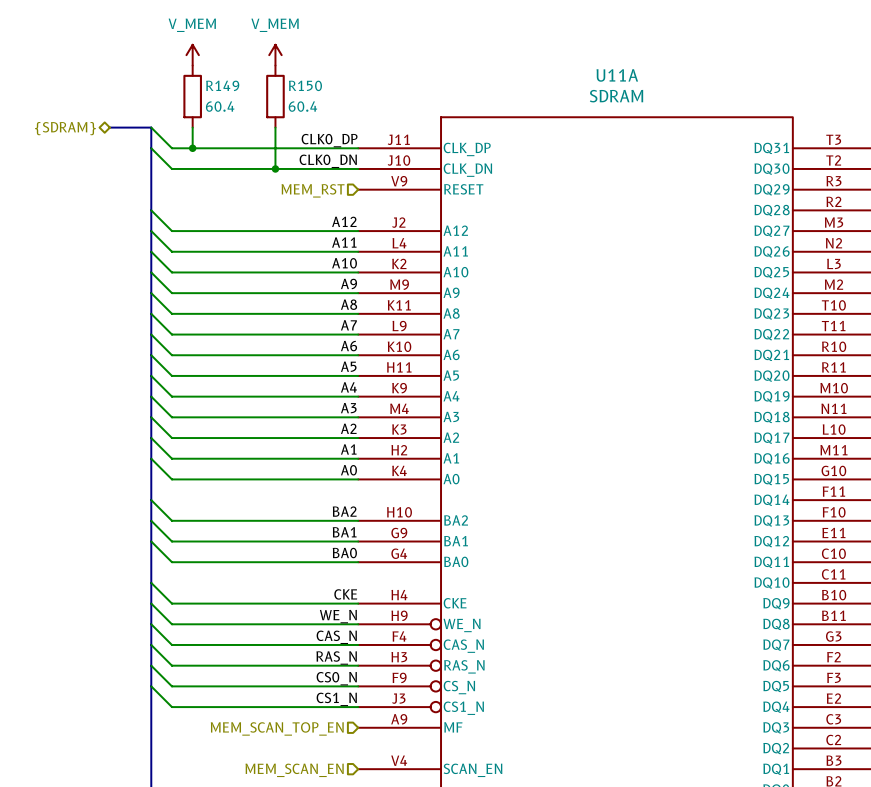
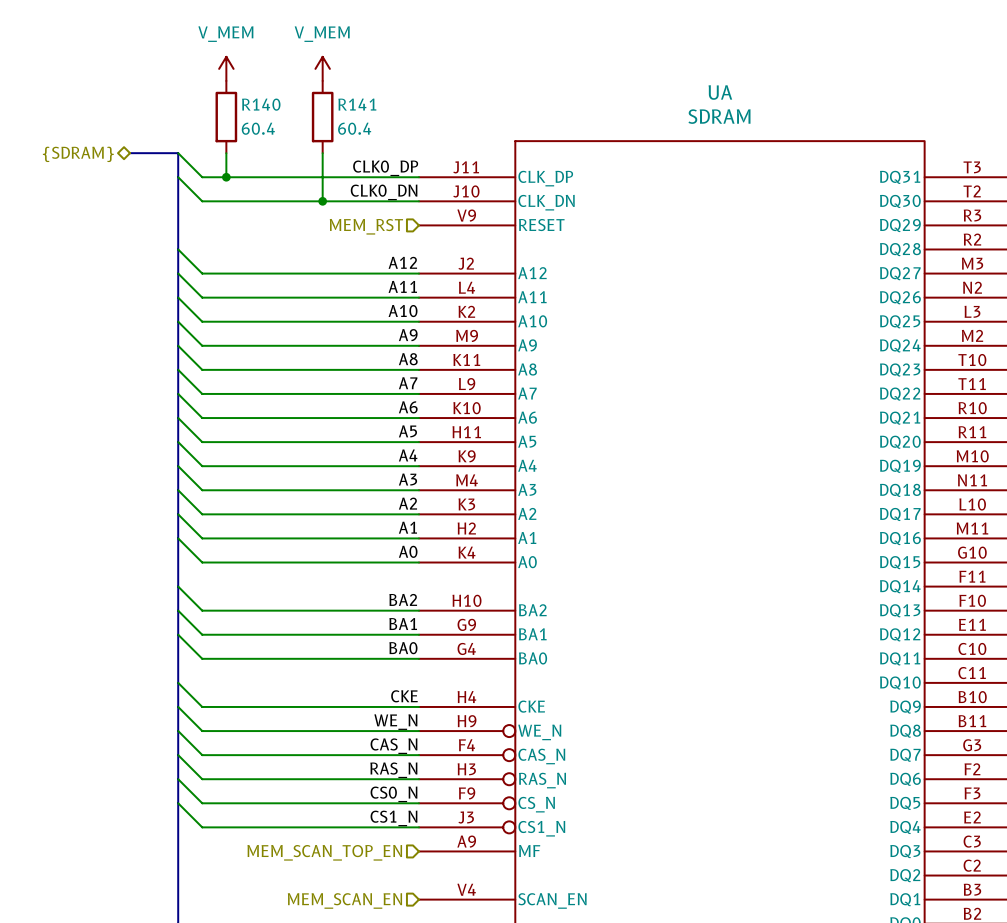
U11A name: U11A (617, 75) -> UA (720, 92)
R149 name: R149 (222, 85) -> R140 (261, 104)
R150 name: R150 (305, 85) -> R141 (357, 104)

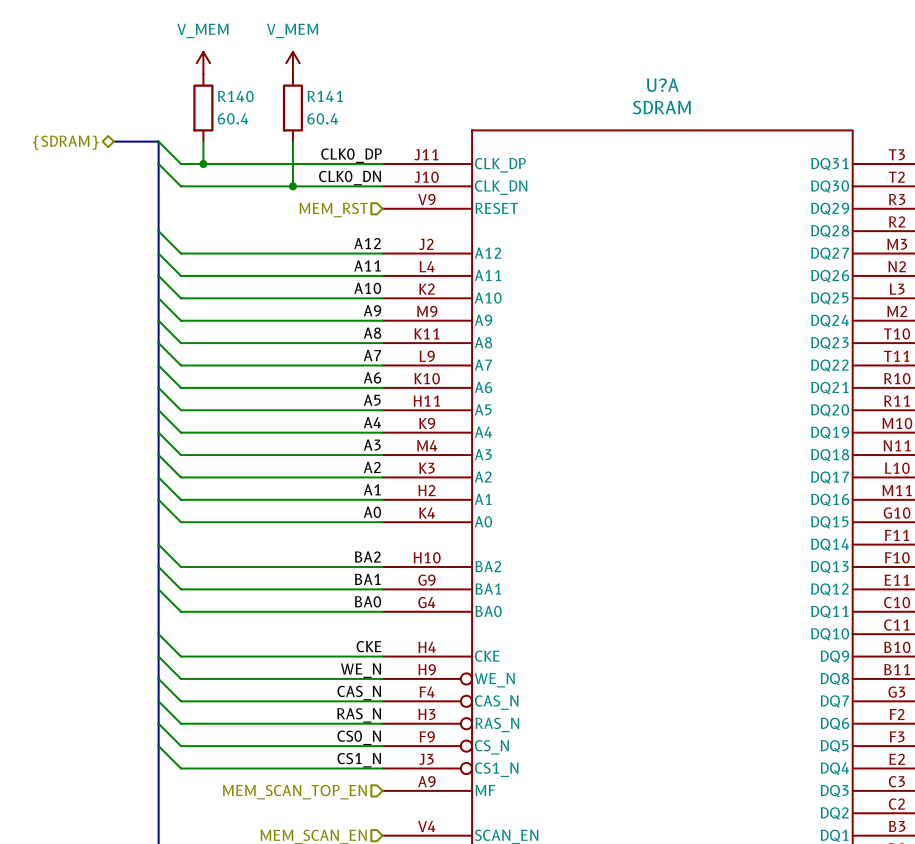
UA name: UA (720, 92) -> U?A (662, 85)

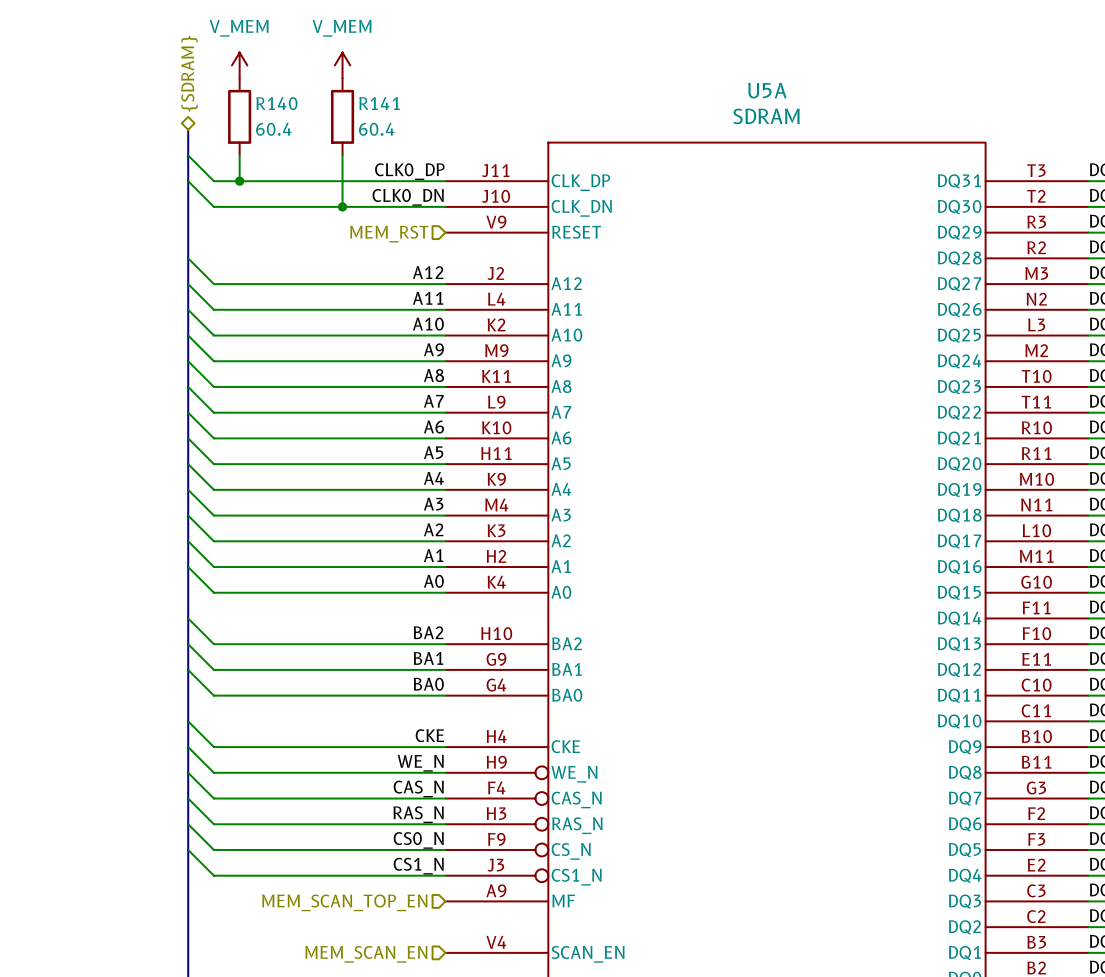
U?A name: U?A (662, 85) -> U5A (767, 90)
bus: (113, 141) (158, 141) -> (188, 129) (188, 155)
hierarchical label rotation: 0° (65, 142) -> 90° clockwise (189, 73)
hierarchical label position: {SDRAM} (65, 142) -> {SDRAM} (189, 73)

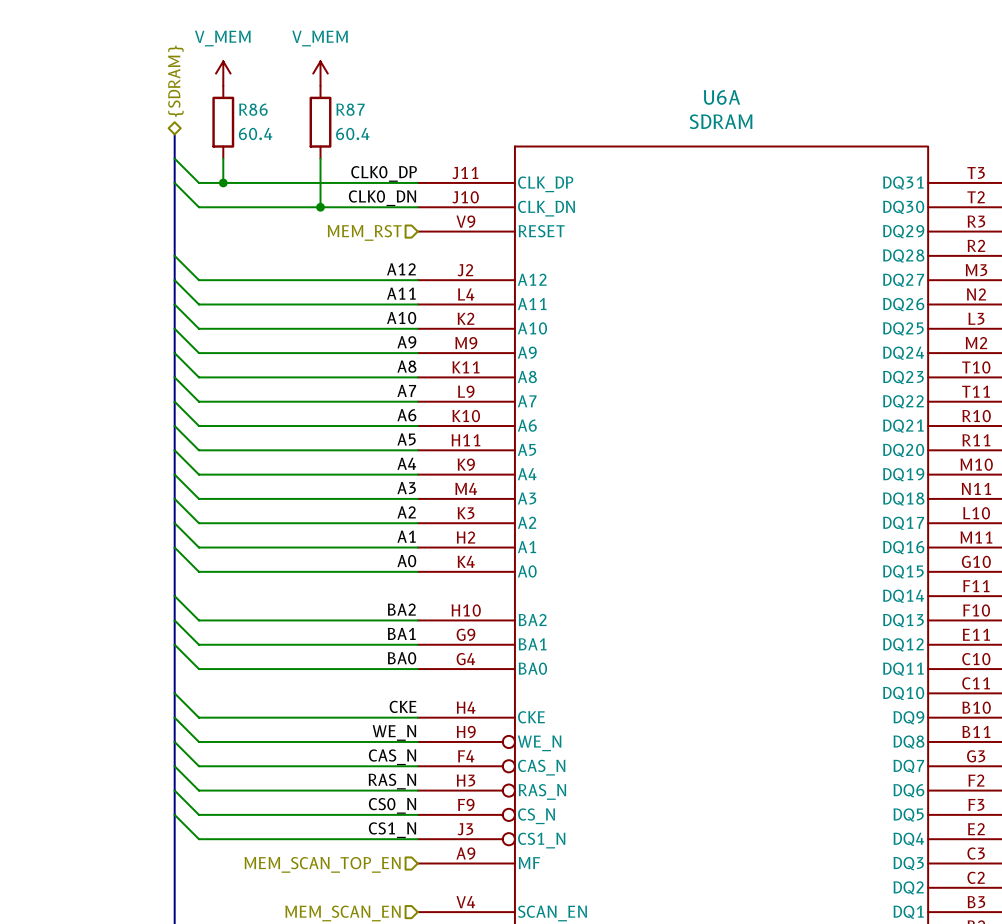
U5A name: U5A (767, 90) -> U6A (721, 97)
R140 name: R140 (276, 103) -> R86 (253, 109)
R141 name: R141 (379, 103) -> R87 (350, 109)

